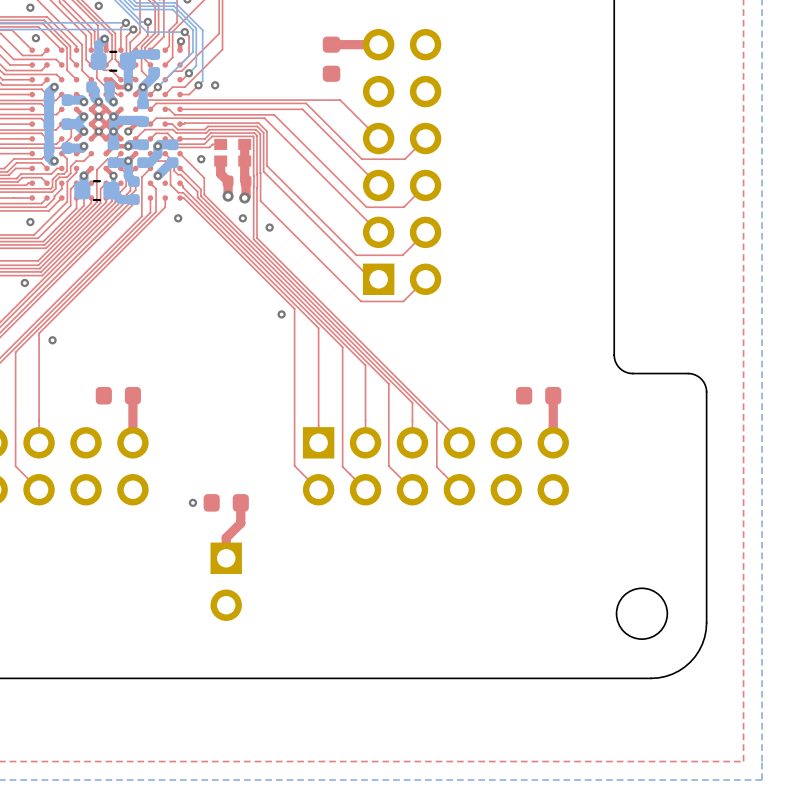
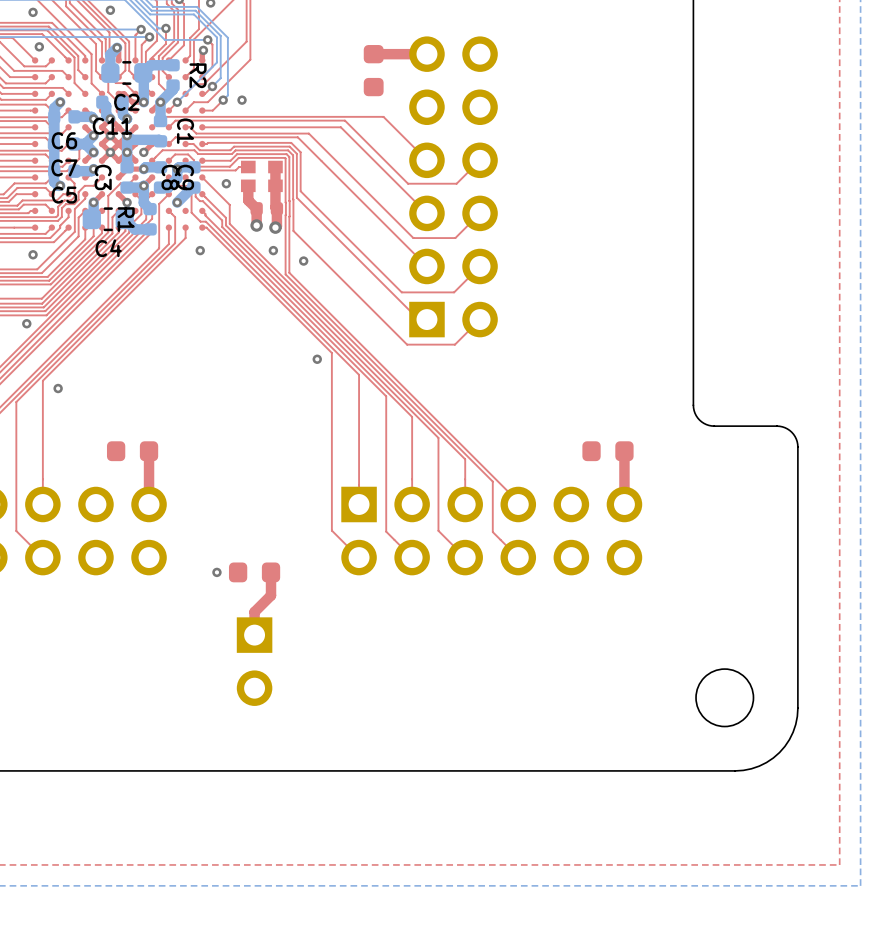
R2 name: none -> R2 (198, 75)
C2 name: none -> C2 (126, 102)
C11 name: none -> C11 (112, 126)
C1 name: none -> C1 (185, 131)
C6 name: none -> C6 (64, 140)
C7 name: none -> C7 (64, 167)
C3 name: none -> C3 (103, 177)
C8 name: none -> C8 (170, 177)
C9 name: none -> C9 (185, 177)
C5 name: none -> C5 (64, 195)
R1 name: none -> R1 (126, 219)
C4 name: none -> C4 (108, 248)

